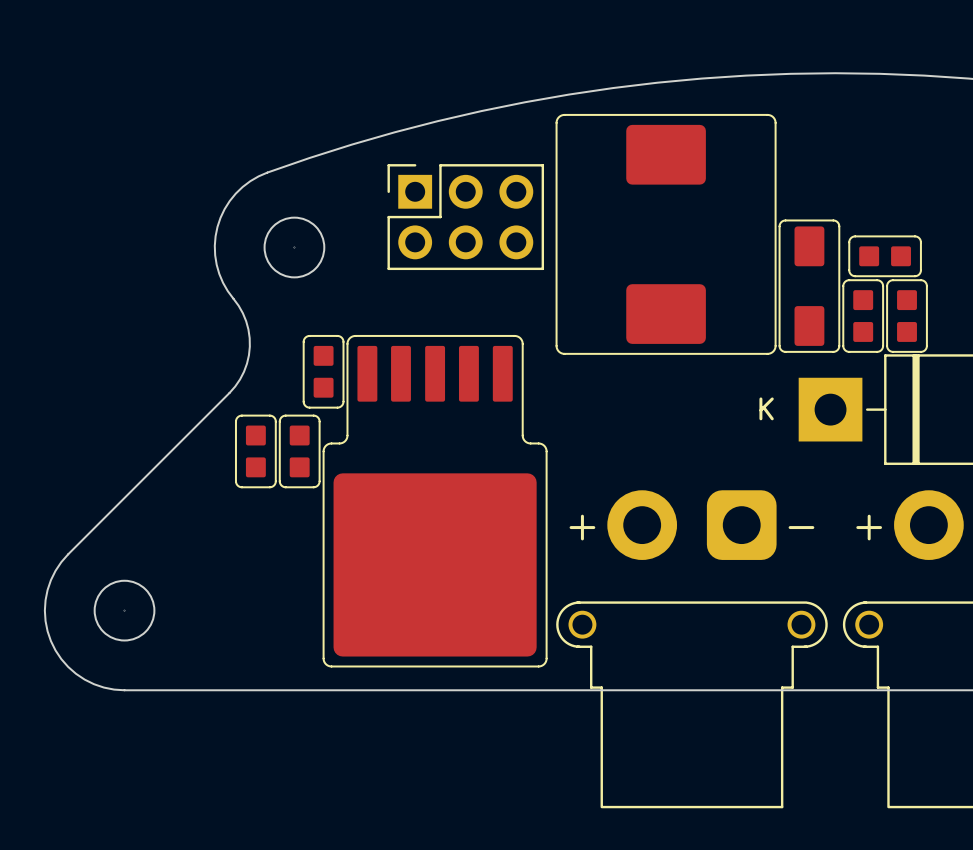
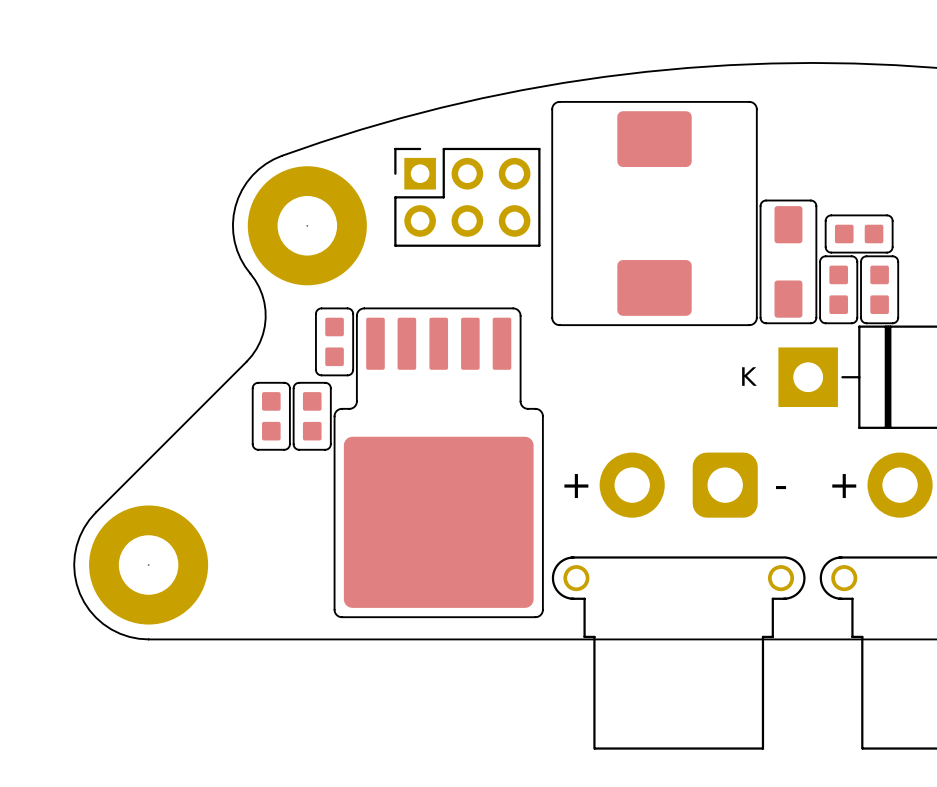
round board edge: [263, 216, 326, 279] -> none
part: none -> (307, 225)
round board edge: [93, 579, 156, 642] -> none
part: none -> (148, 565)

